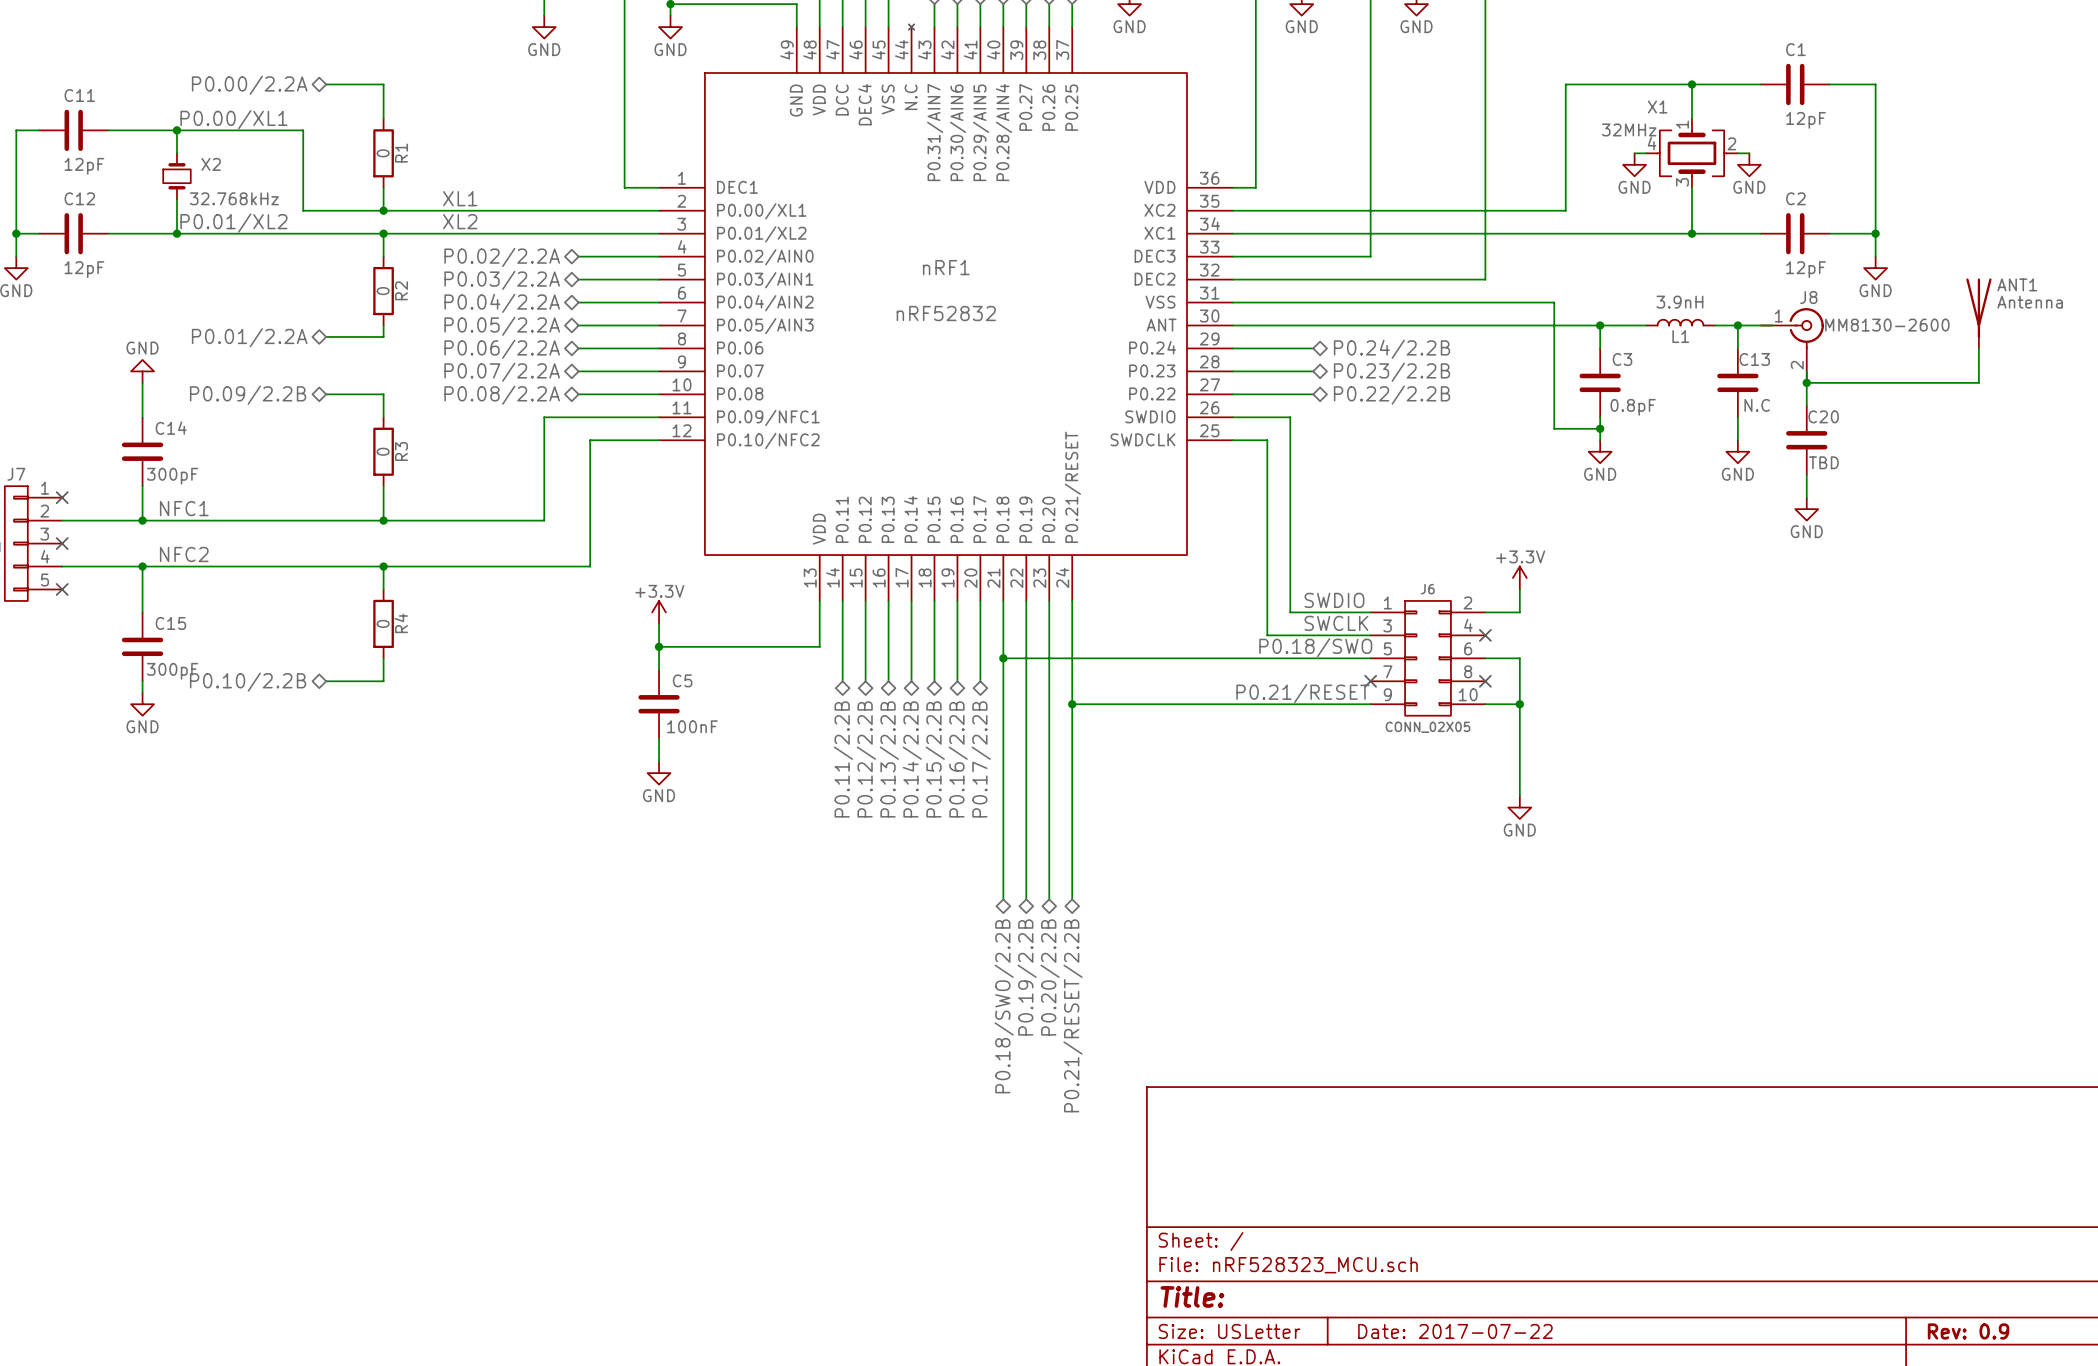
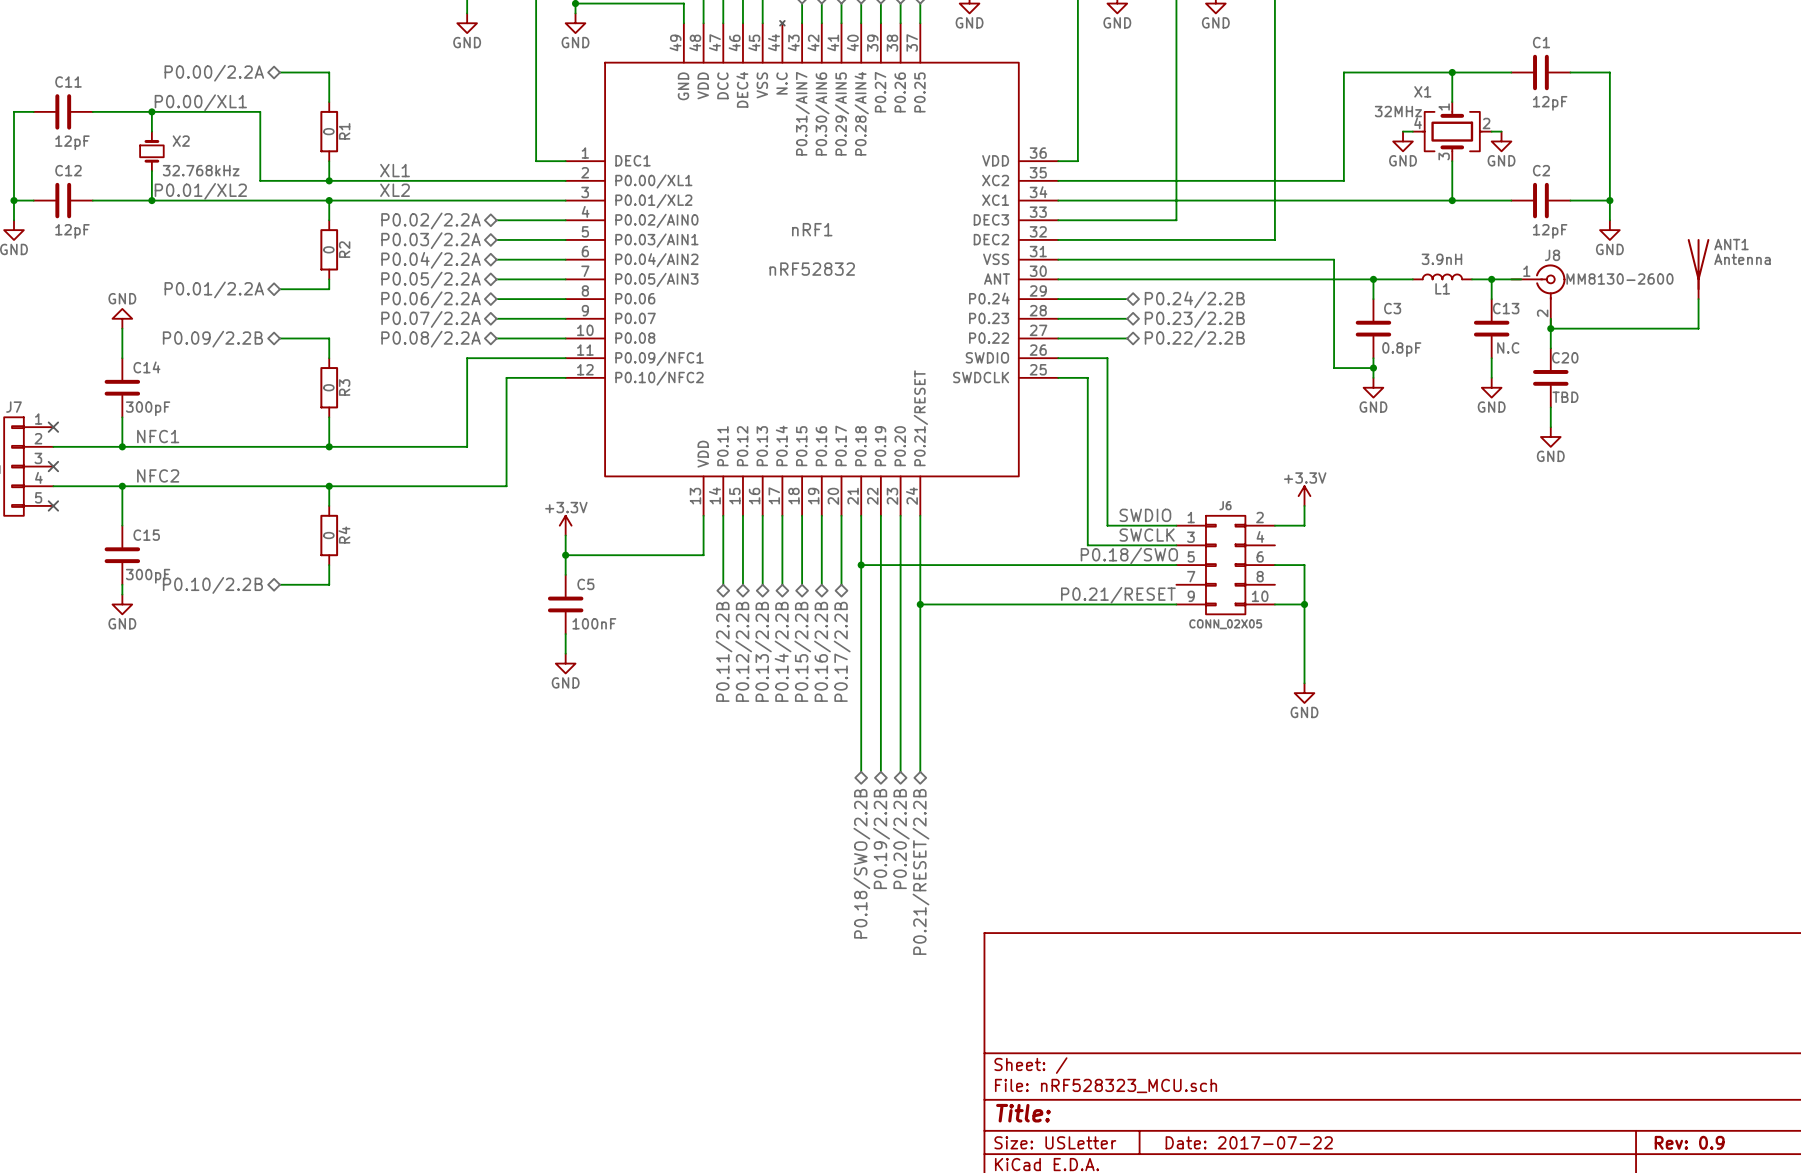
no-connect mark: (1485, 635) -> none
no-connect mark: (1370, 681) -> none
no-connect mark: (1485, 681) -> none

